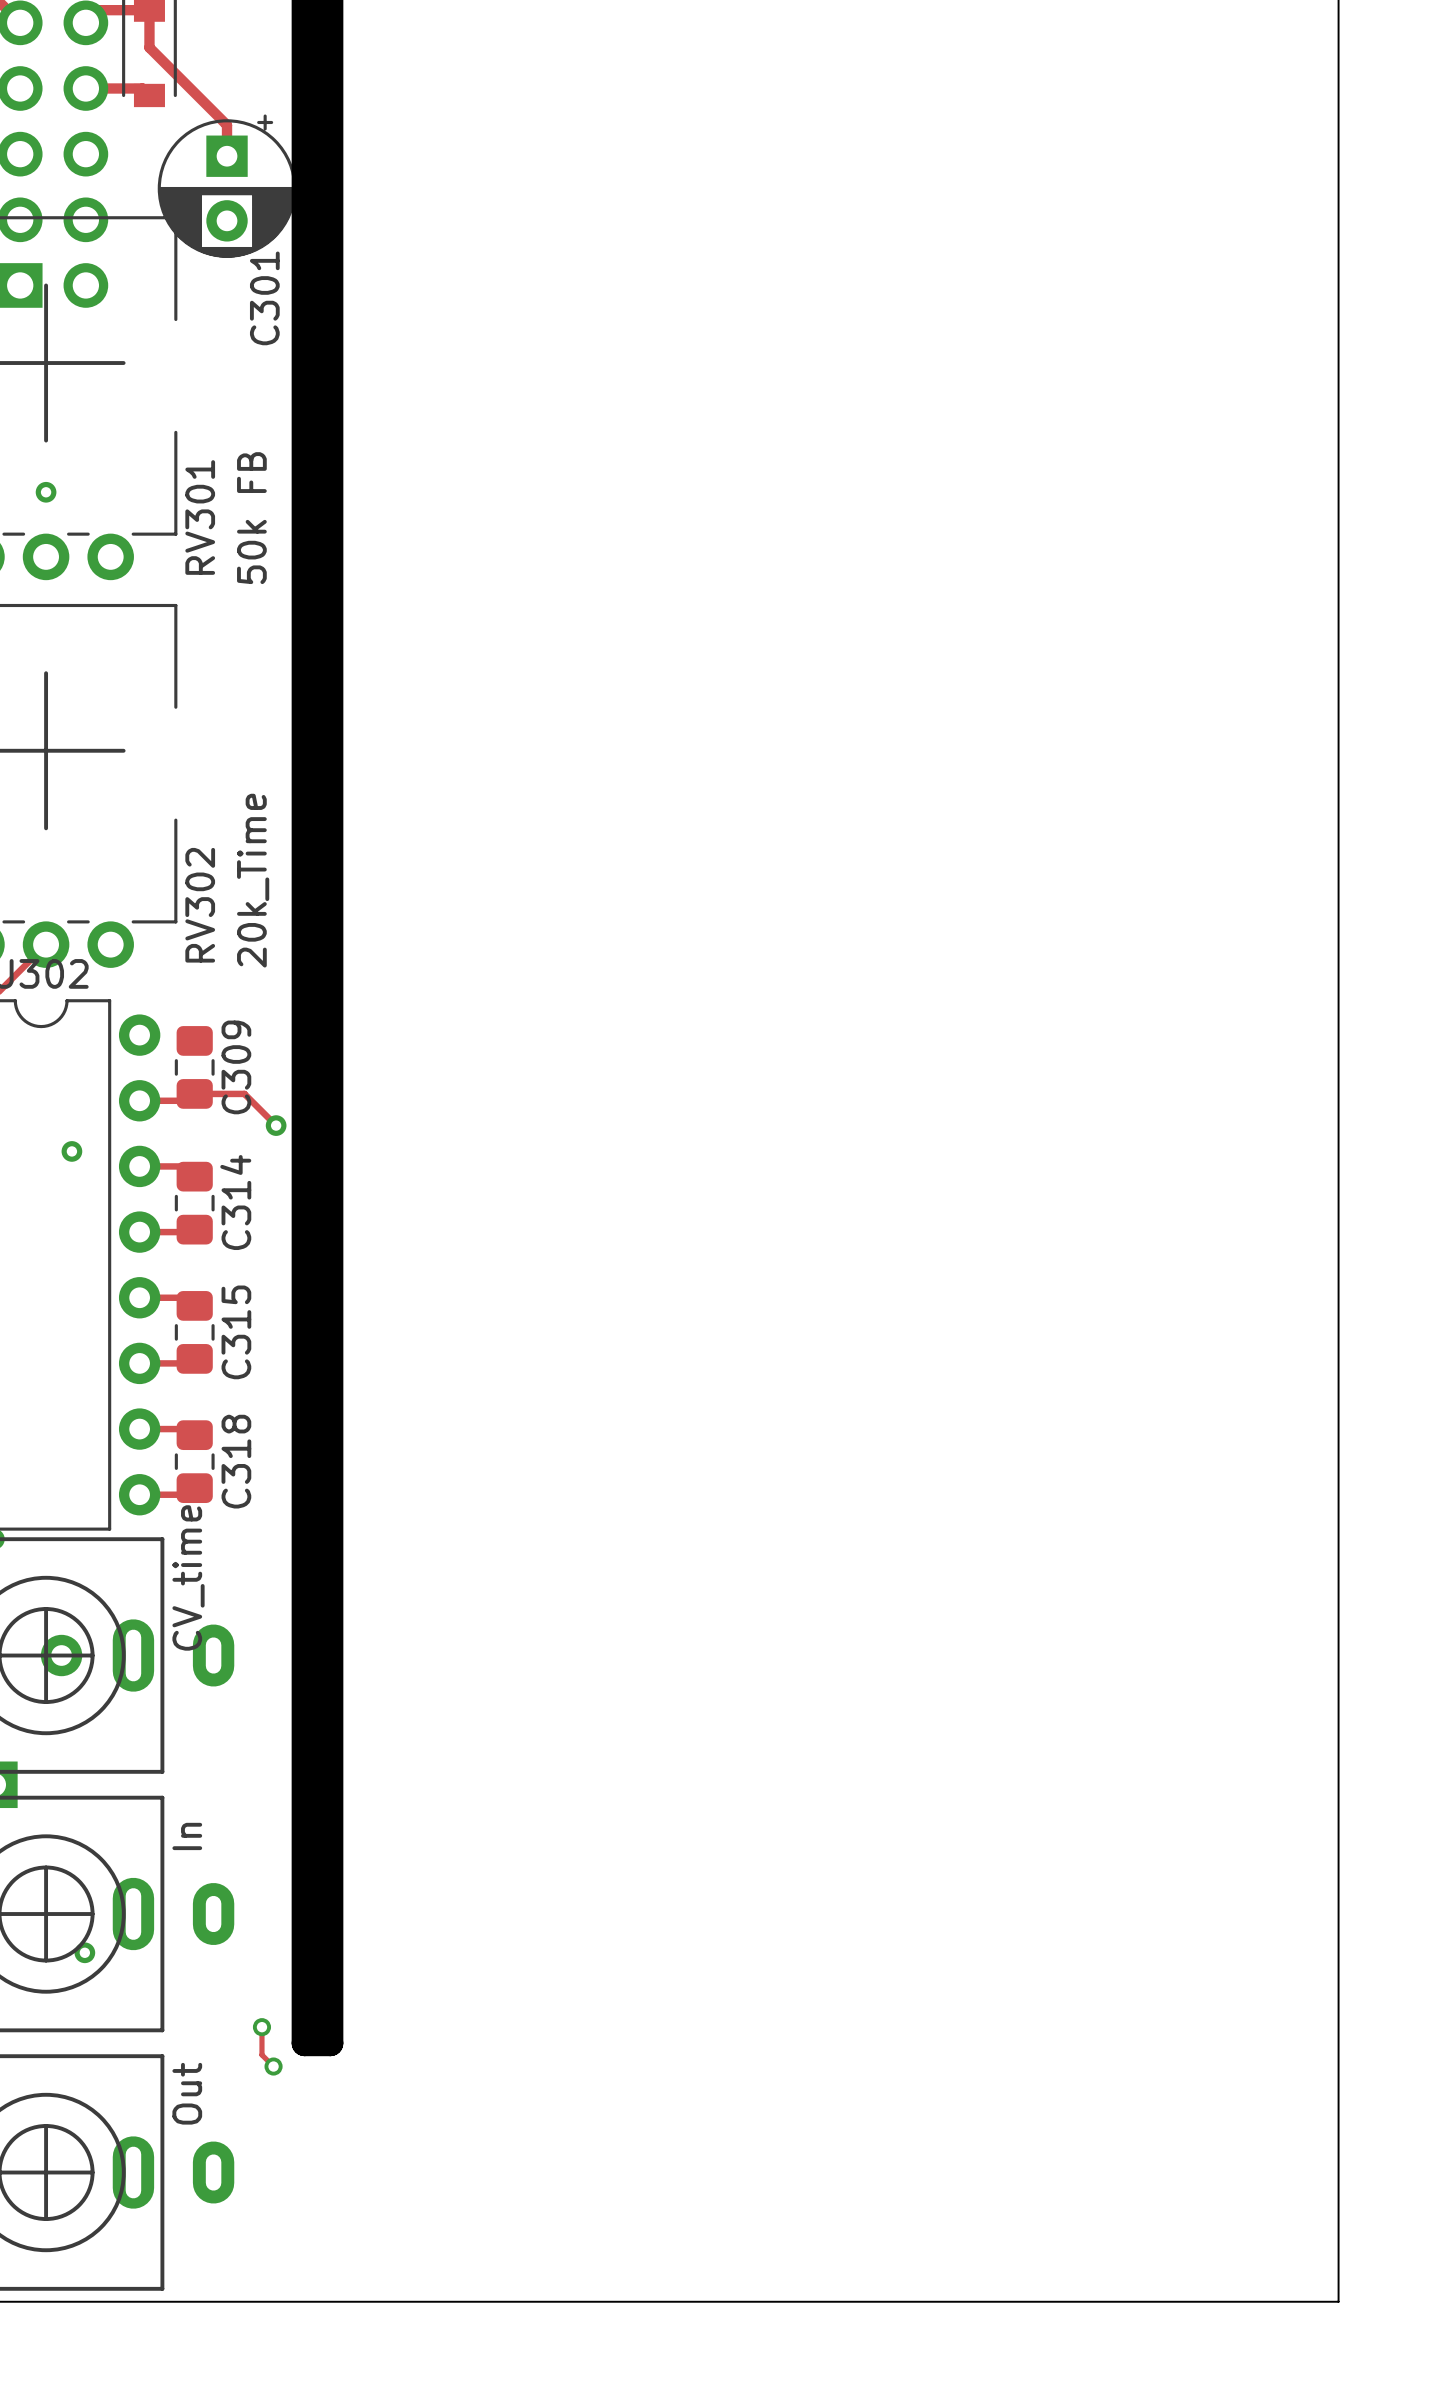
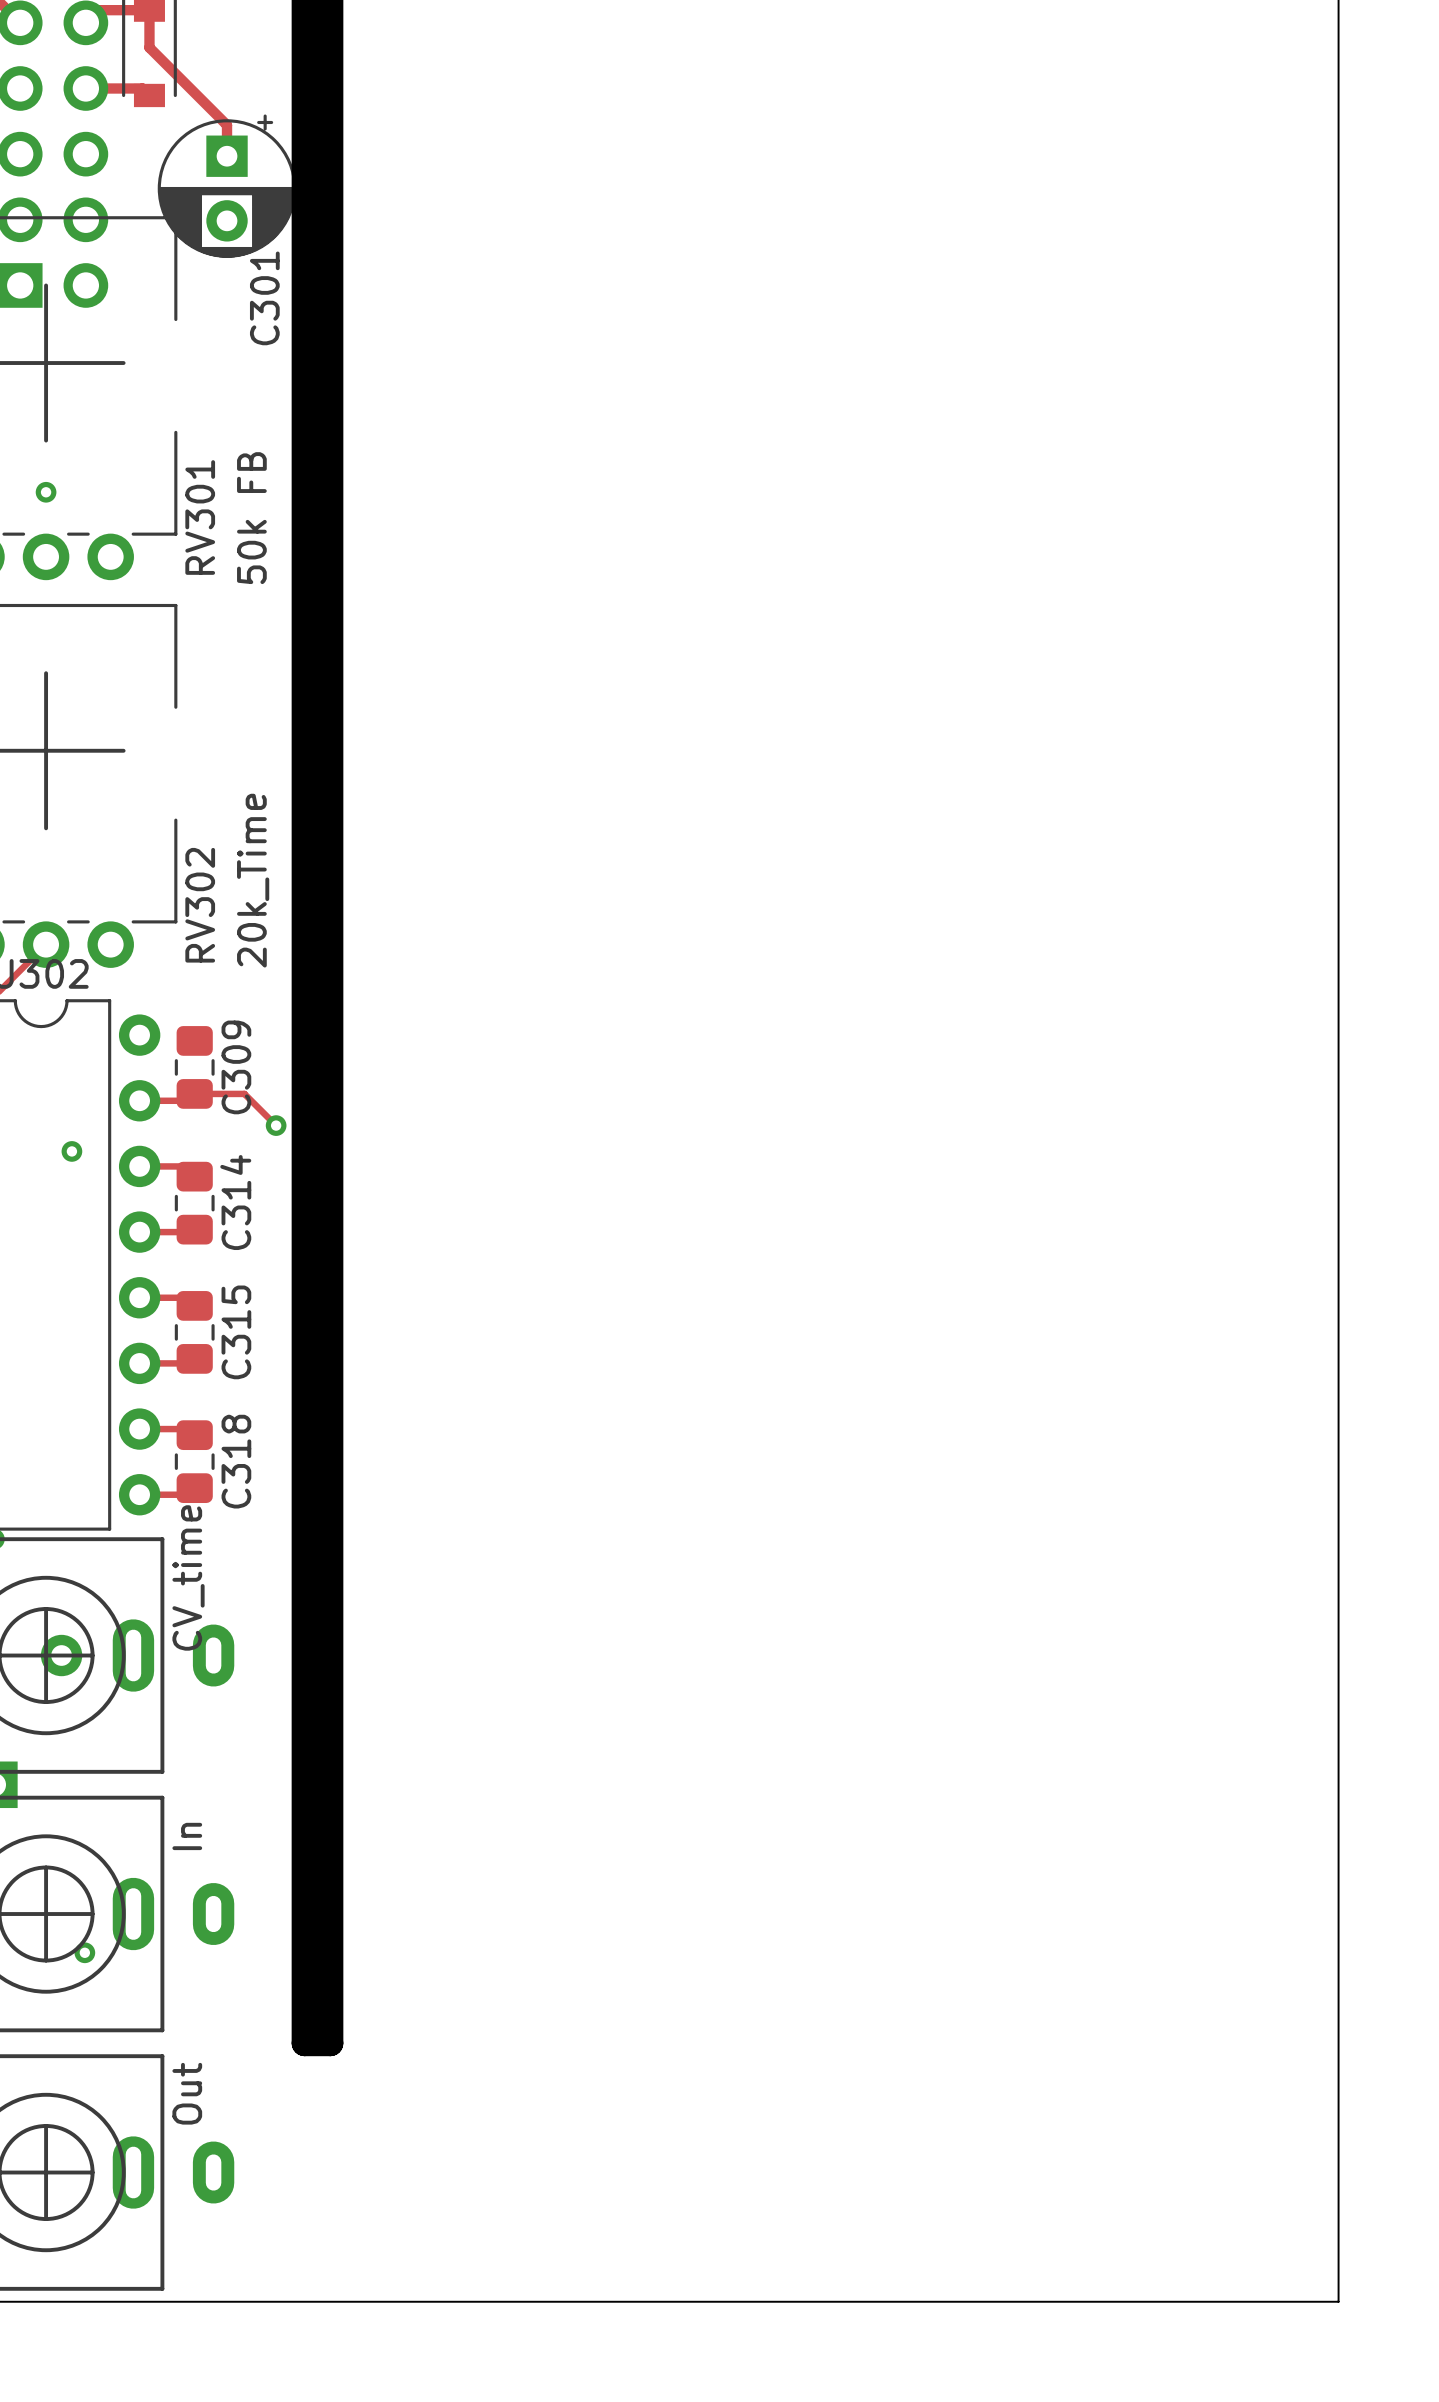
track: (261, 2027) (261, 2054) (273, 2066) -> none
via: (261, 2027) -> none
via: (273, 2066) -> none

